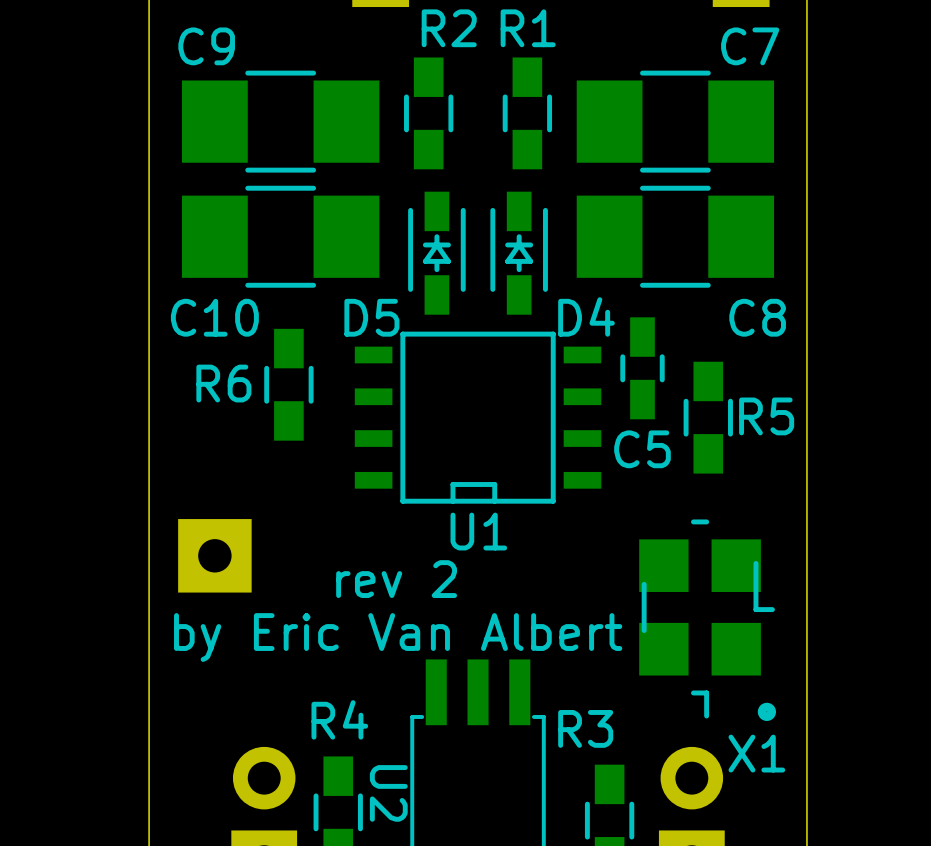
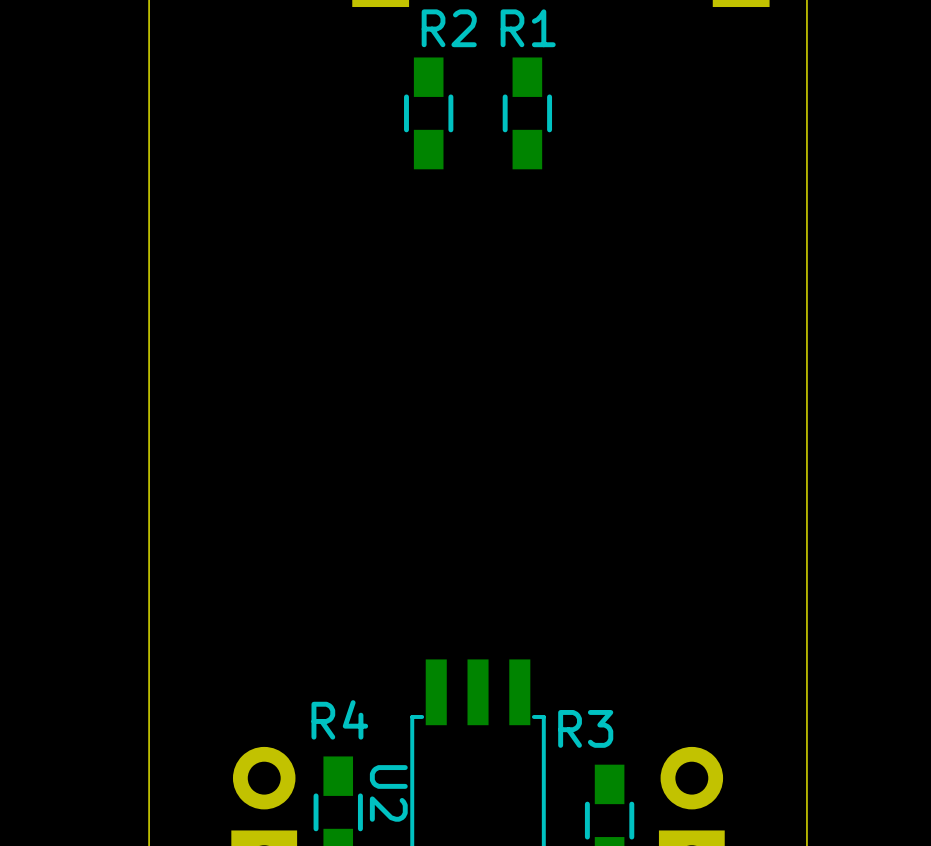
C9: (280, 121) -> none
C7: (675, 121) -> none
C10: (280, 236) -> none
C8: (675, 236) -> none
D5: (436, 253) -> none
D4: (519, 253) -> none
C5: (642, 368) -> none
R6: (288, 384) -> none
U1: (478, 417) -> none
R5: (708, 417) -> none
part: (214, 555) -> none
text: rev 2 (396, 579) -> none
X1: (707, 620) -> none
text: by Eric Van Albert (398, 637) -> none

